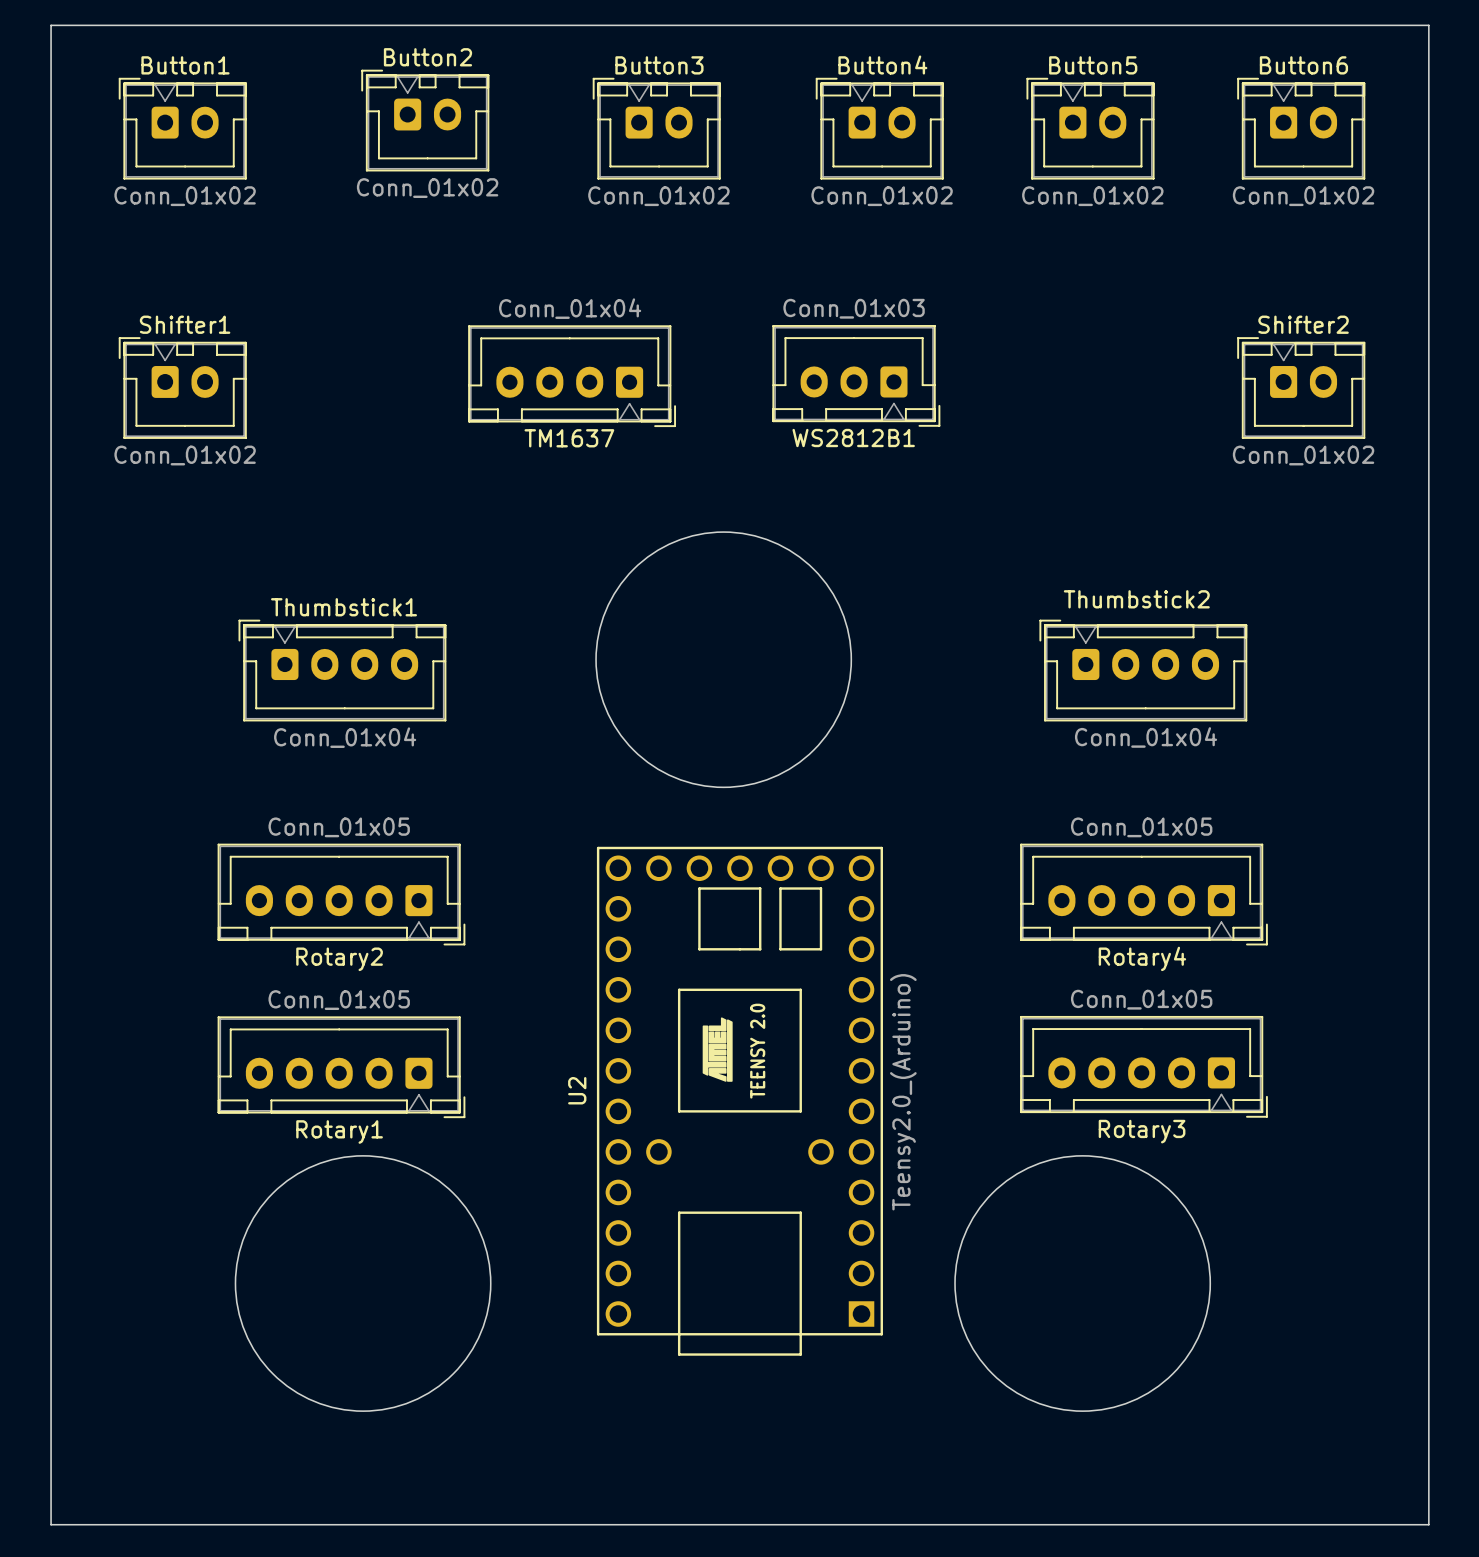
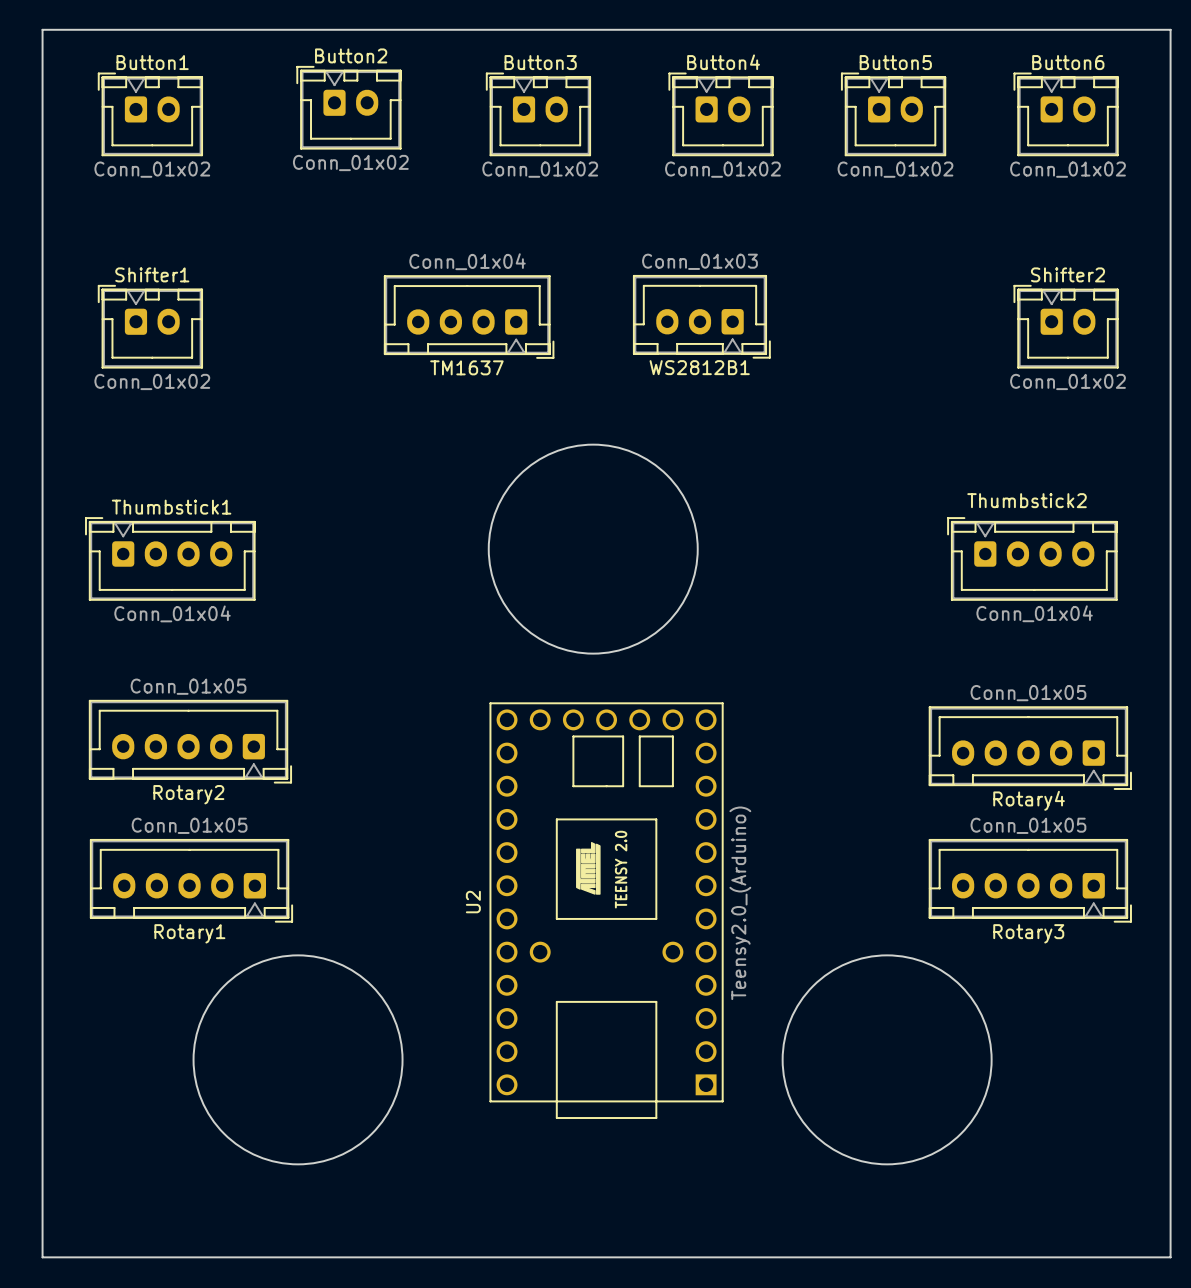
Thumbstick1 position: (342, 670) -> (170, 558)
Thumbstick2 position: (1143, 670) -> (1032, 558)
Rotary2 position: (341, 894) -> (190, 741)
Rotary4 position: (1143, 894) -> (1030, 748)
Rotary3 position: (1143, 1066) -> (1030, 880)
Rotary1 position: (341, 1067) -> (191, 880)

